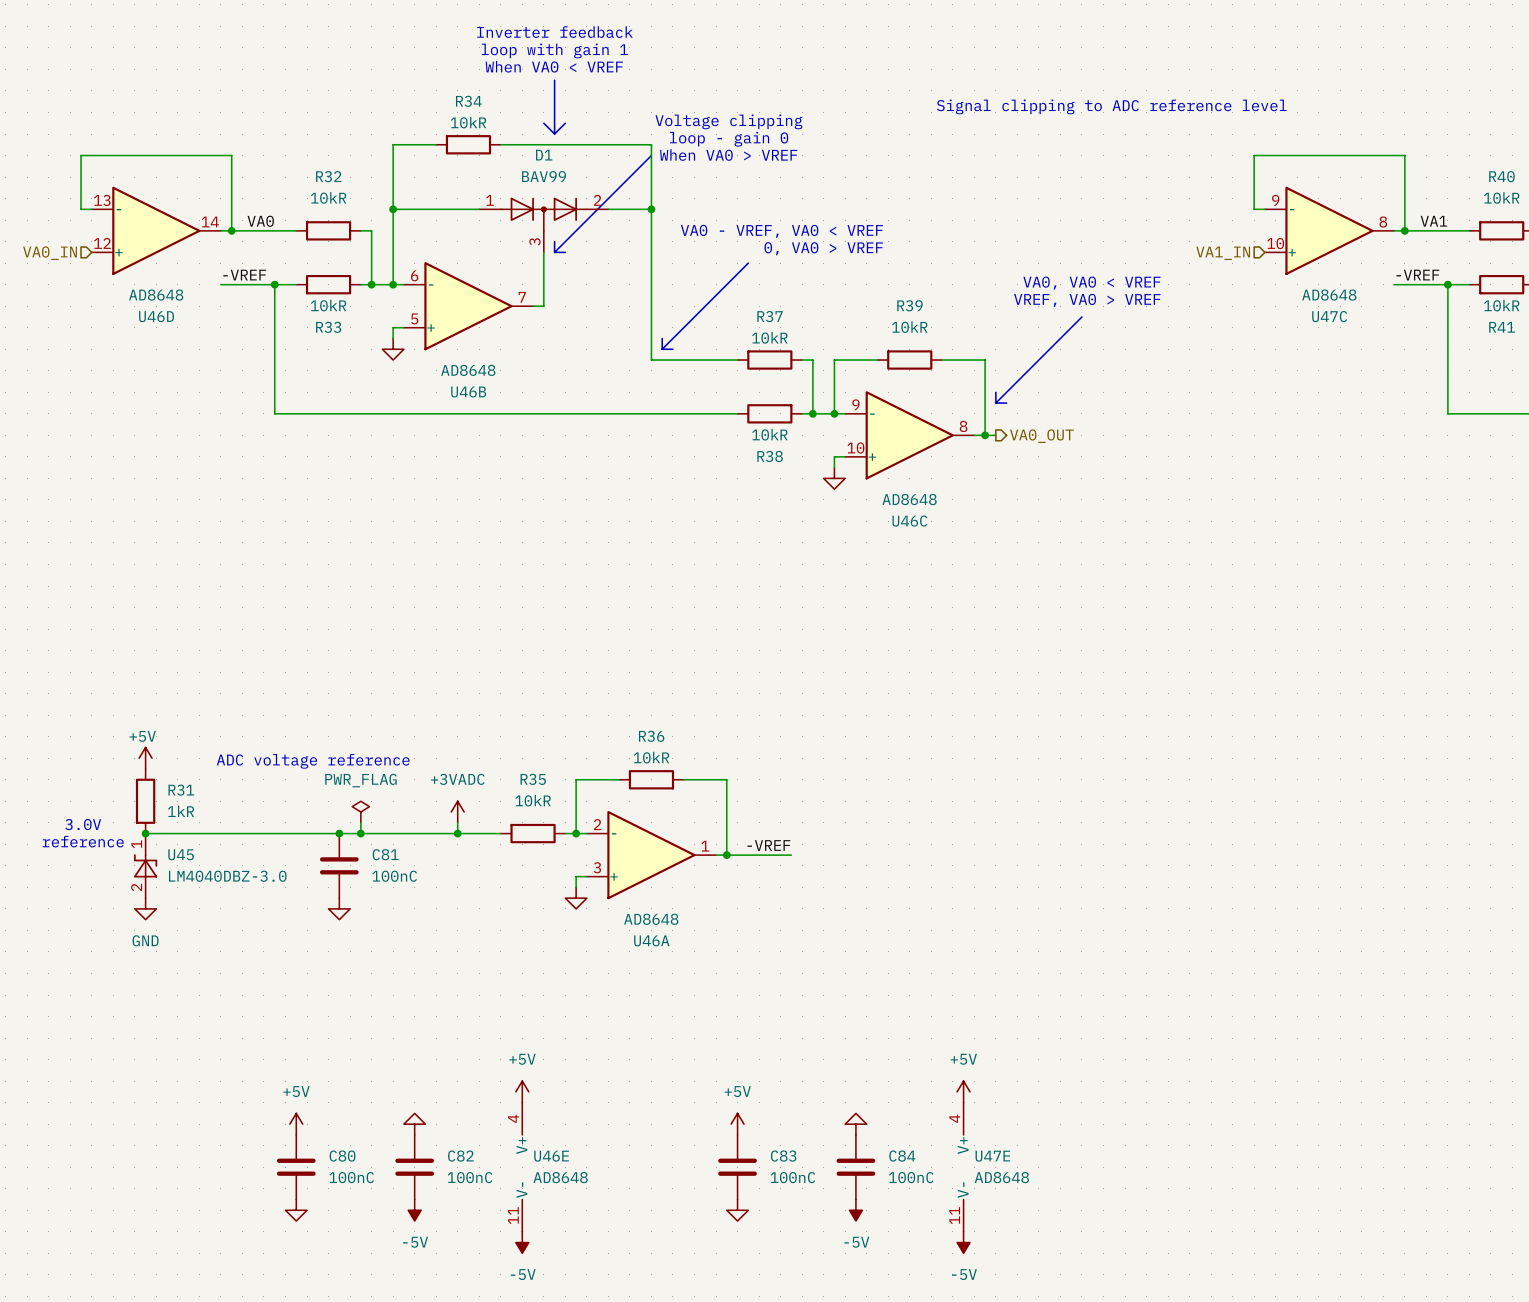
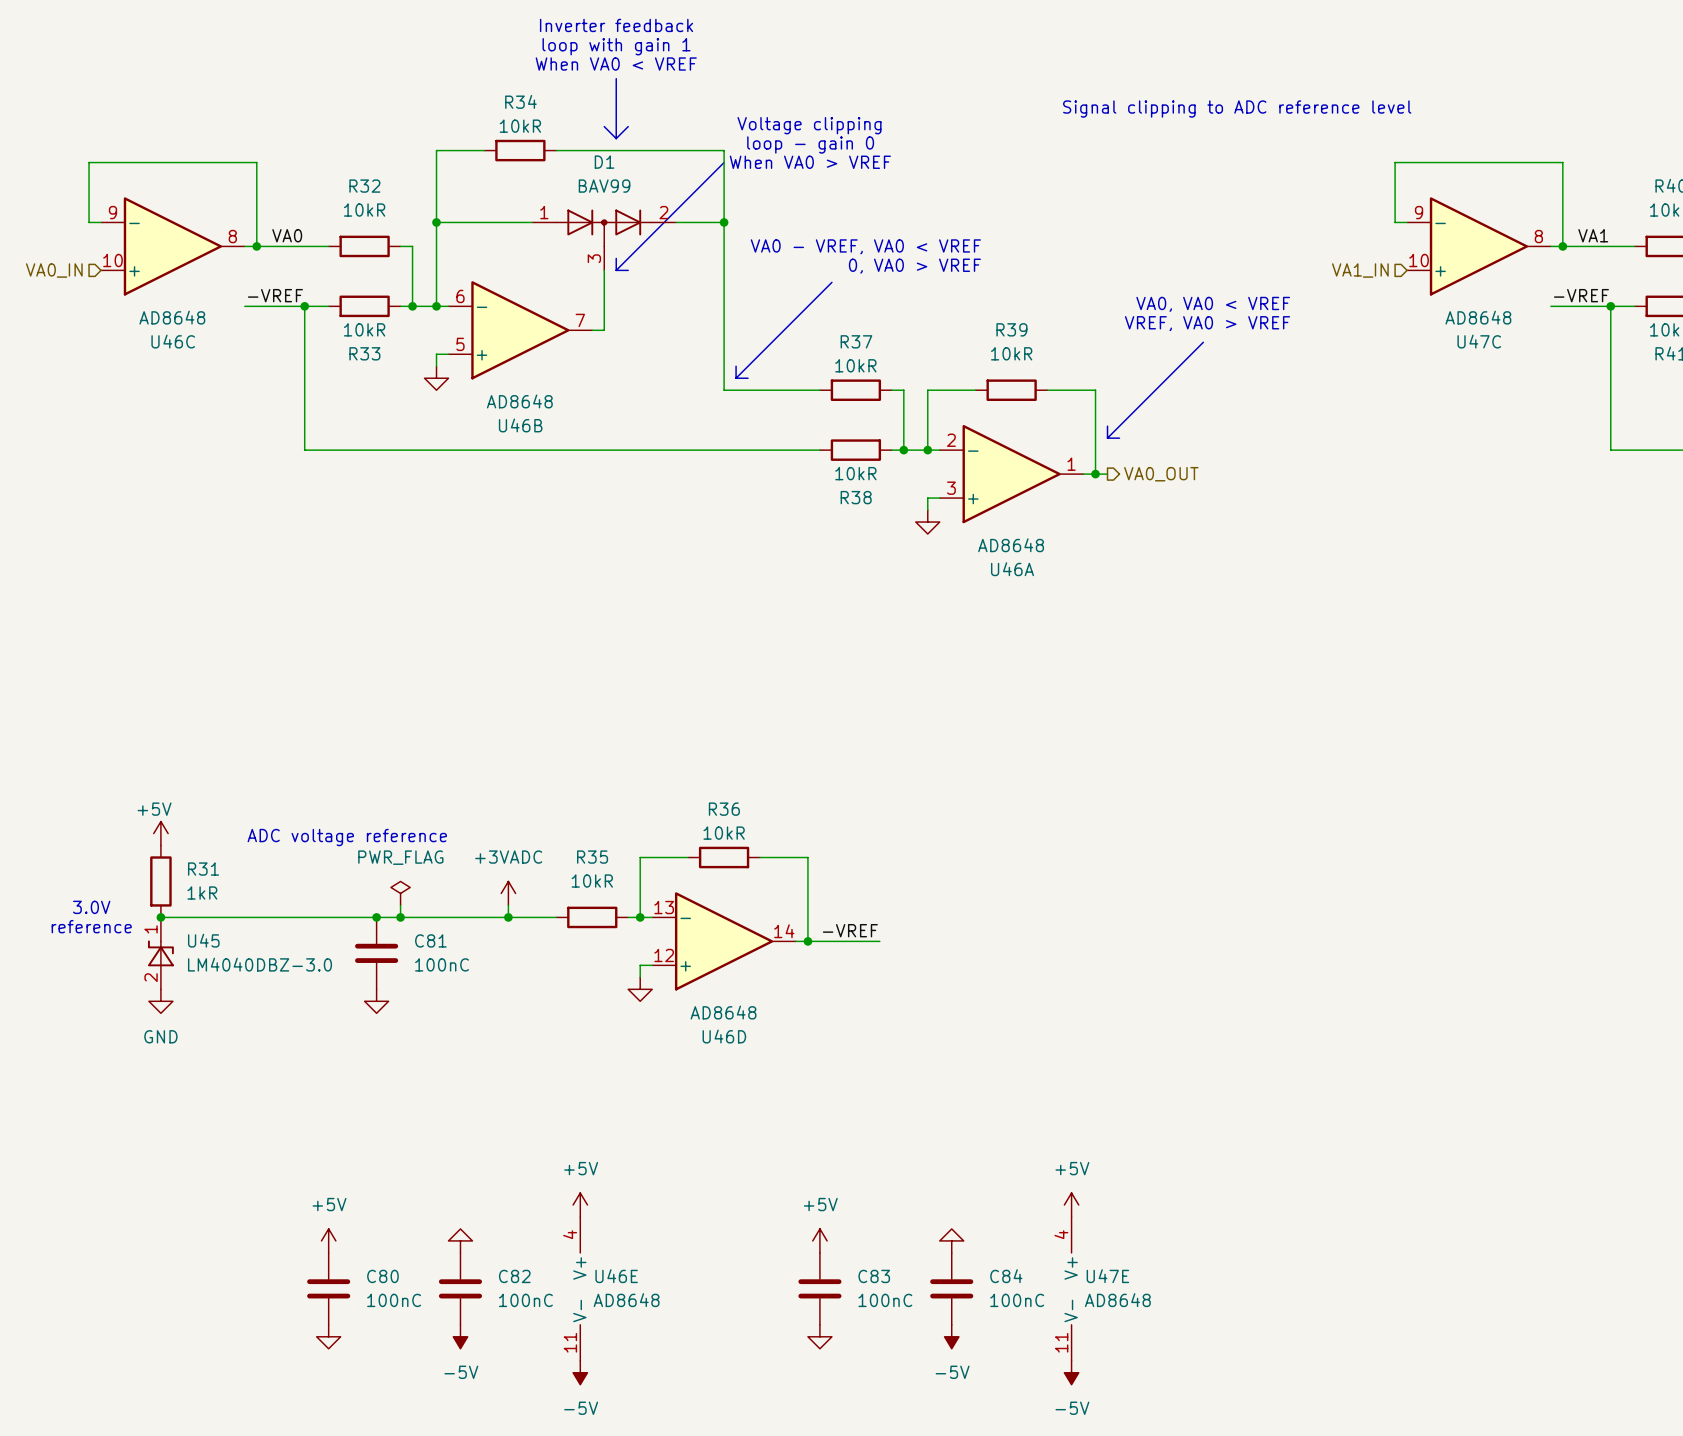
U46D position: (156, 230) -> (724, 941)
U46C position: (909, 435) -> (172, 246)
U46A position: (651, 855) -> (1011, 474)

